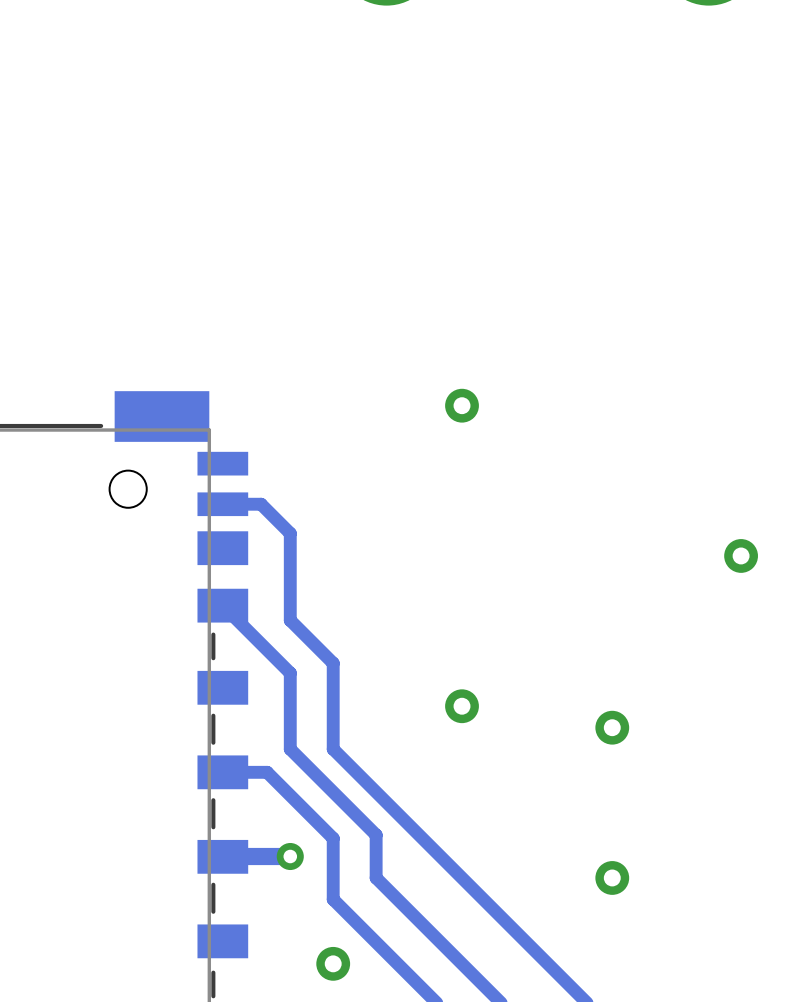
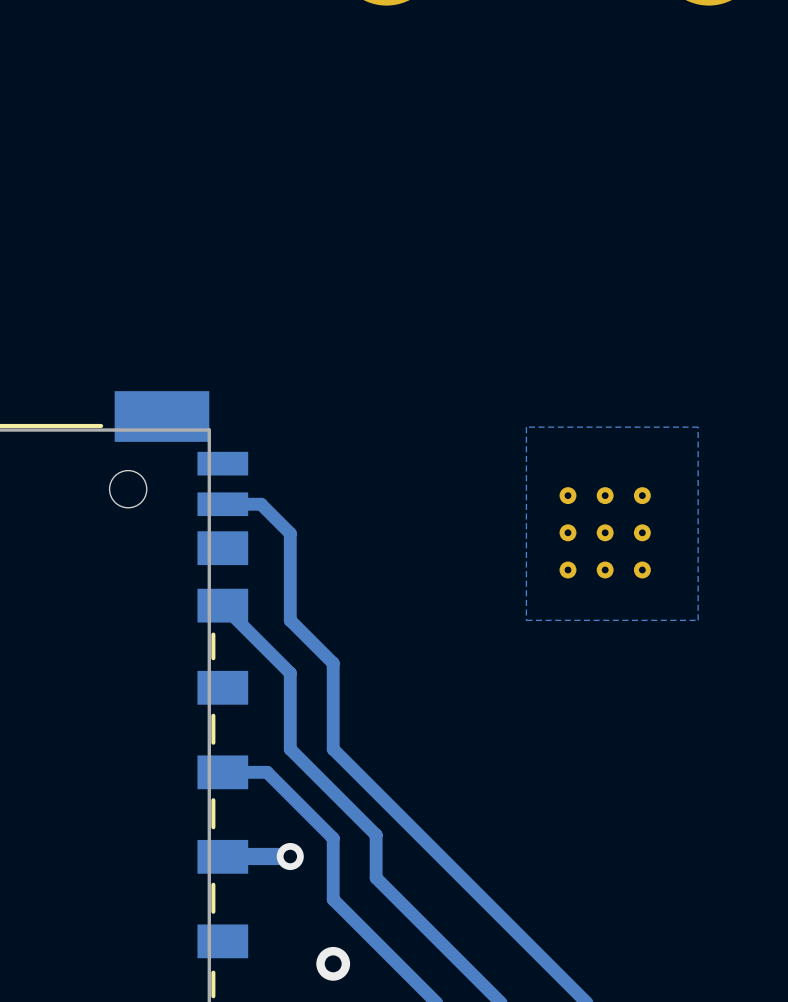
via: (462, 405) -> none
zone outline: none -> (698, 427) (698, 620) (526, 620) (526, 427) (698, 427)
part: none -> (605, 532)
via: (741, 555) -> none
via: (462, 706) -> none
via: (612, 727) -> none
via: (612, 877) -> none

